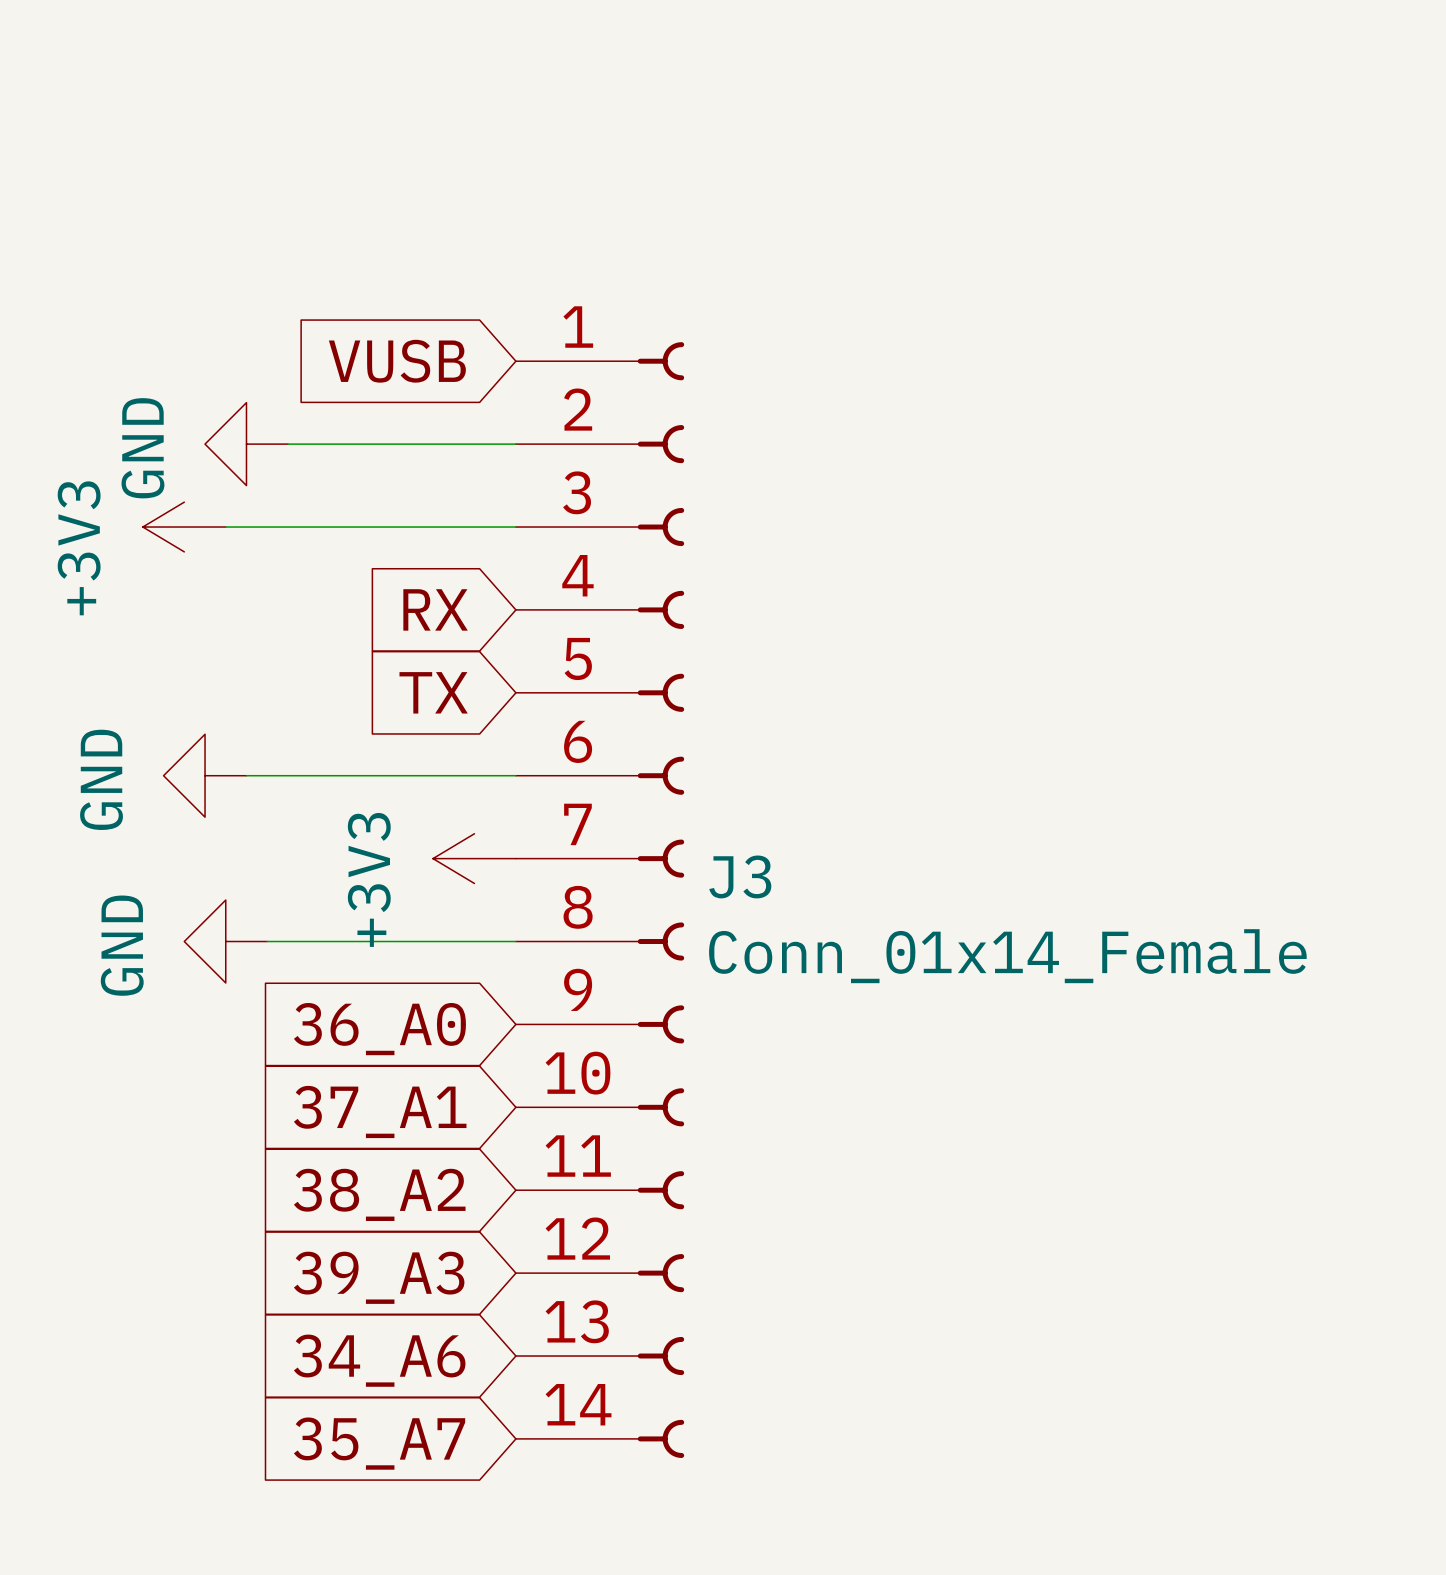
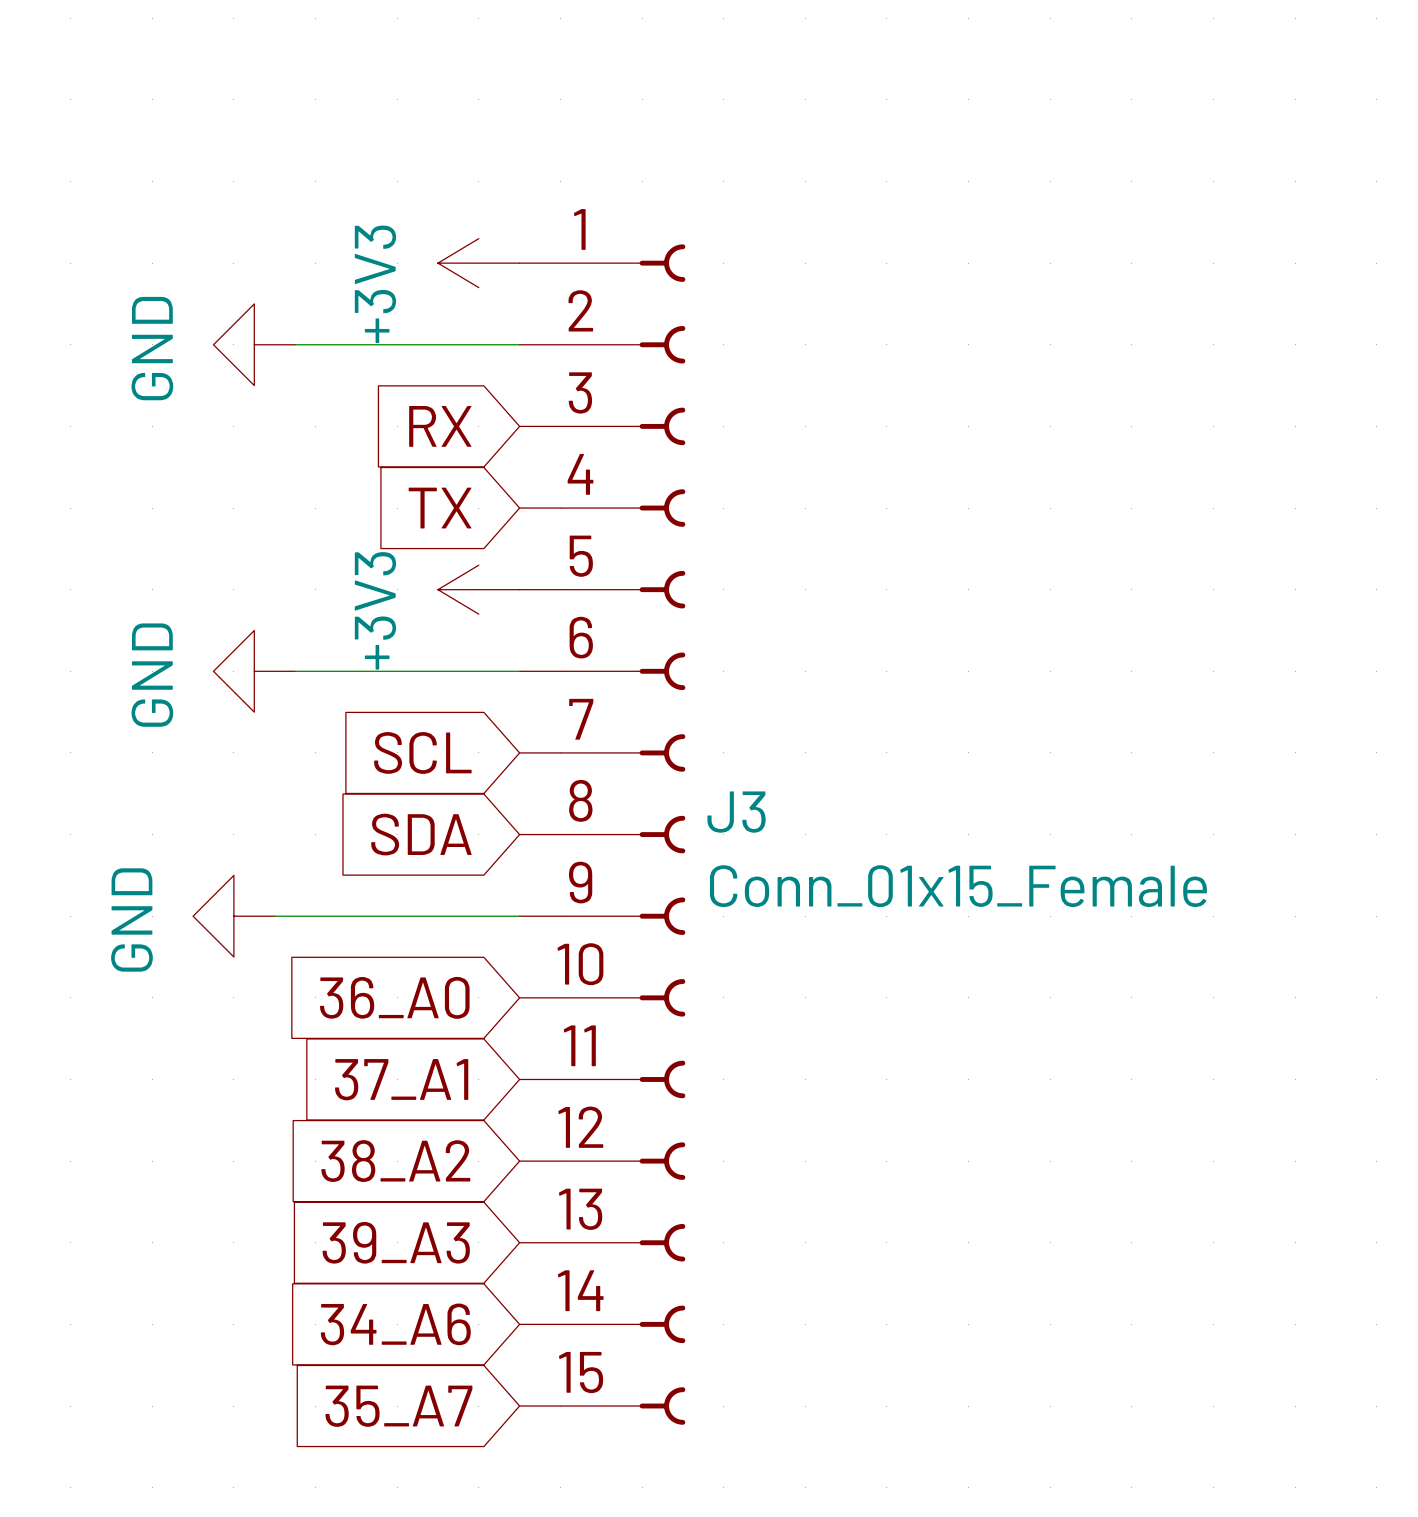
power symbol: none -> +3V3 (478, 263)
J3 symbol: [515, 342, 685, 1458] -> [519, 244, 686, 1425]
global label: VUSB (397, 361) -> none
power symbol position: GND (246, 444) -> GND (254, 344)
wire: (287, 444) (515, 444) -> (295, 344) (519, 344)
power symbol: +3V3 (184, 527) -> none
wire: (225, 527) (515, 527) -> none
global label position: RX (435, 609) -> RX (440, 426)
power symbol: none -> +3V3 (478, 589)
wire: none -> (295, 671) (519, 671)
global label position: TX (433, 692) -> TX (440, 508)
power symbol position: GND (205, 775) -> GND (254, 671)
wire: (246, 775) (515, 775) -> none
global label: none -> SCL (422, 752)
global label: none -> SDA (421, 834)
power symbol: +3V3 (474, 858) -> none
J3 value: Conn_01x14_Female (1007, 956) -> Conn_01x15_Female (958, 886)

